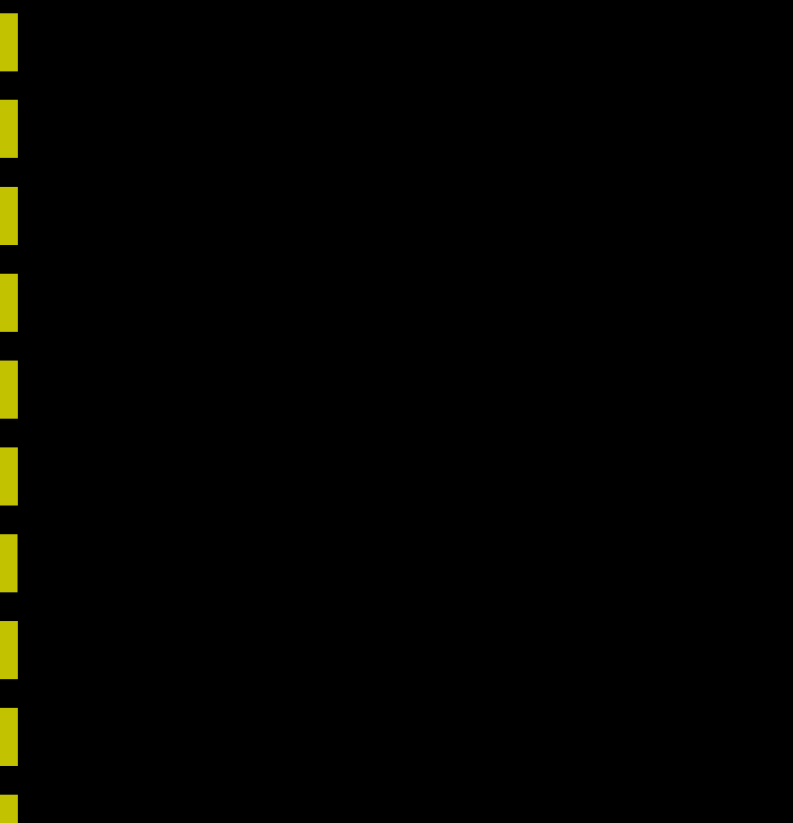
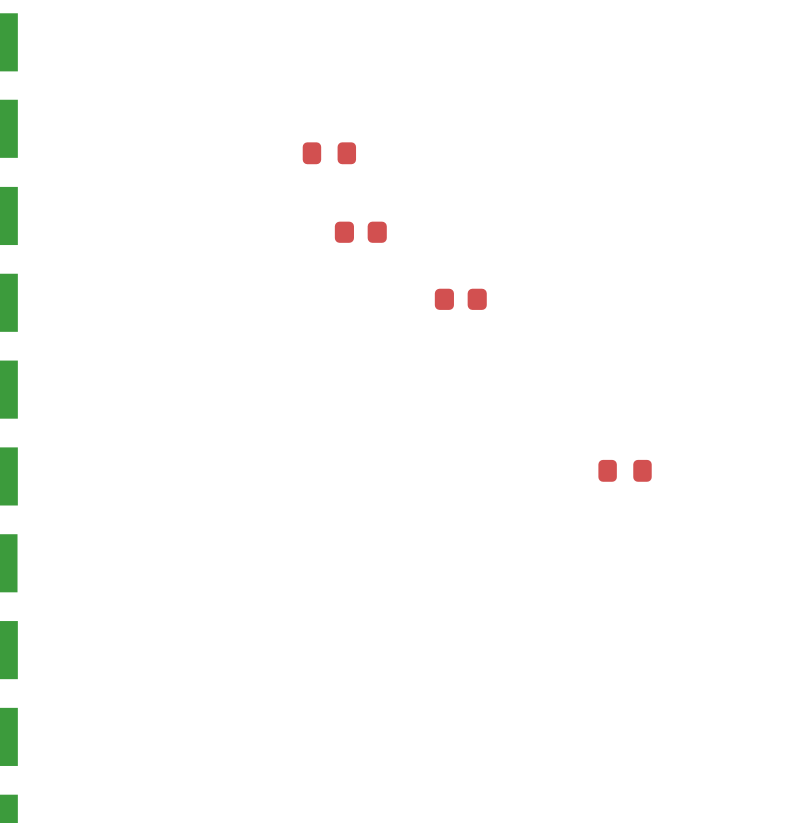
part: none -> (329, 153)
part: none -> (360, 232)
part: none -> (460, 299)
part: none -> (625, 470)

